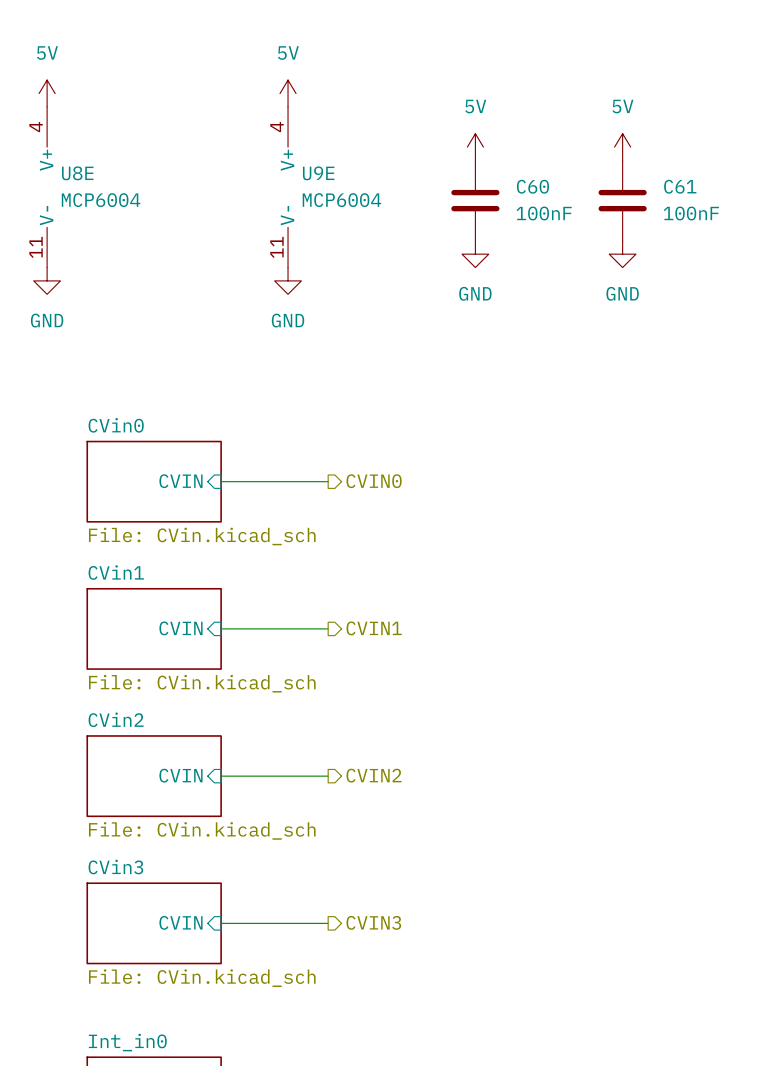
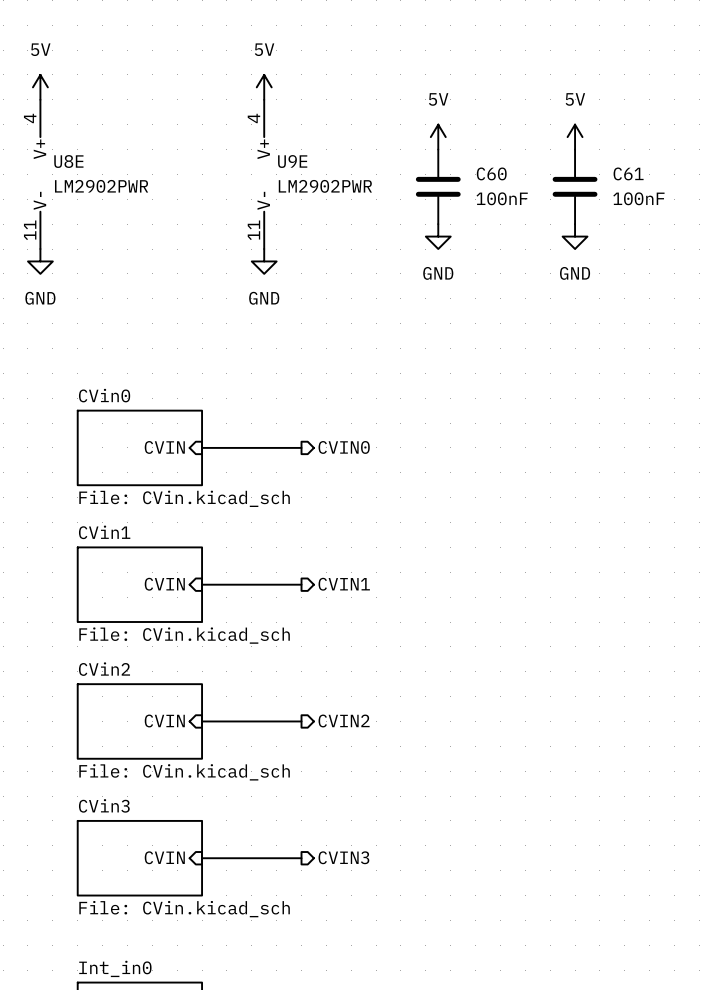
U8E value: MCP6004 (101, 200) -> LM2902PWR (101, 186)
U9E value: MCP6004 (341, 200) -> LM2902PWR (325, 186)

